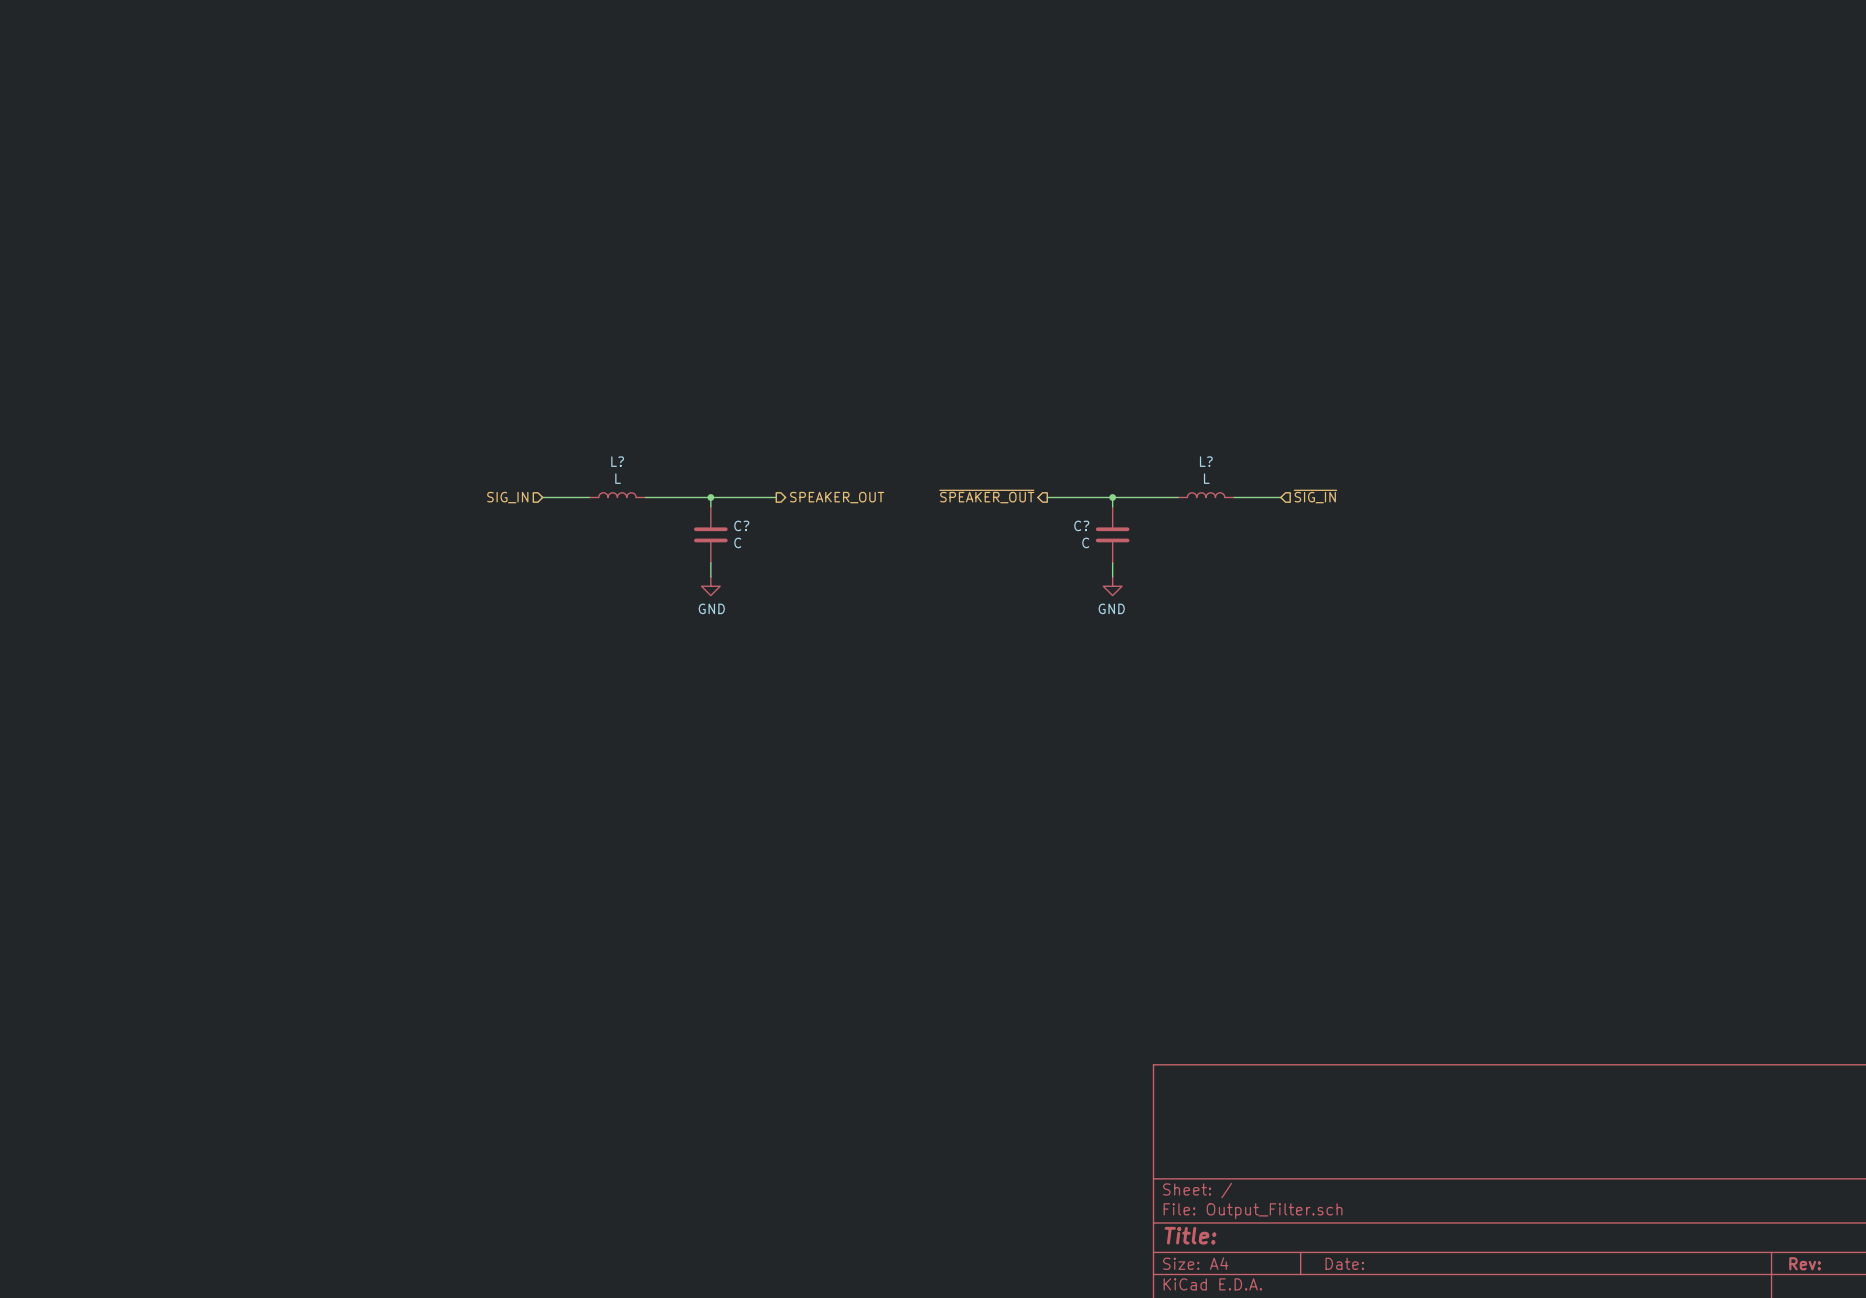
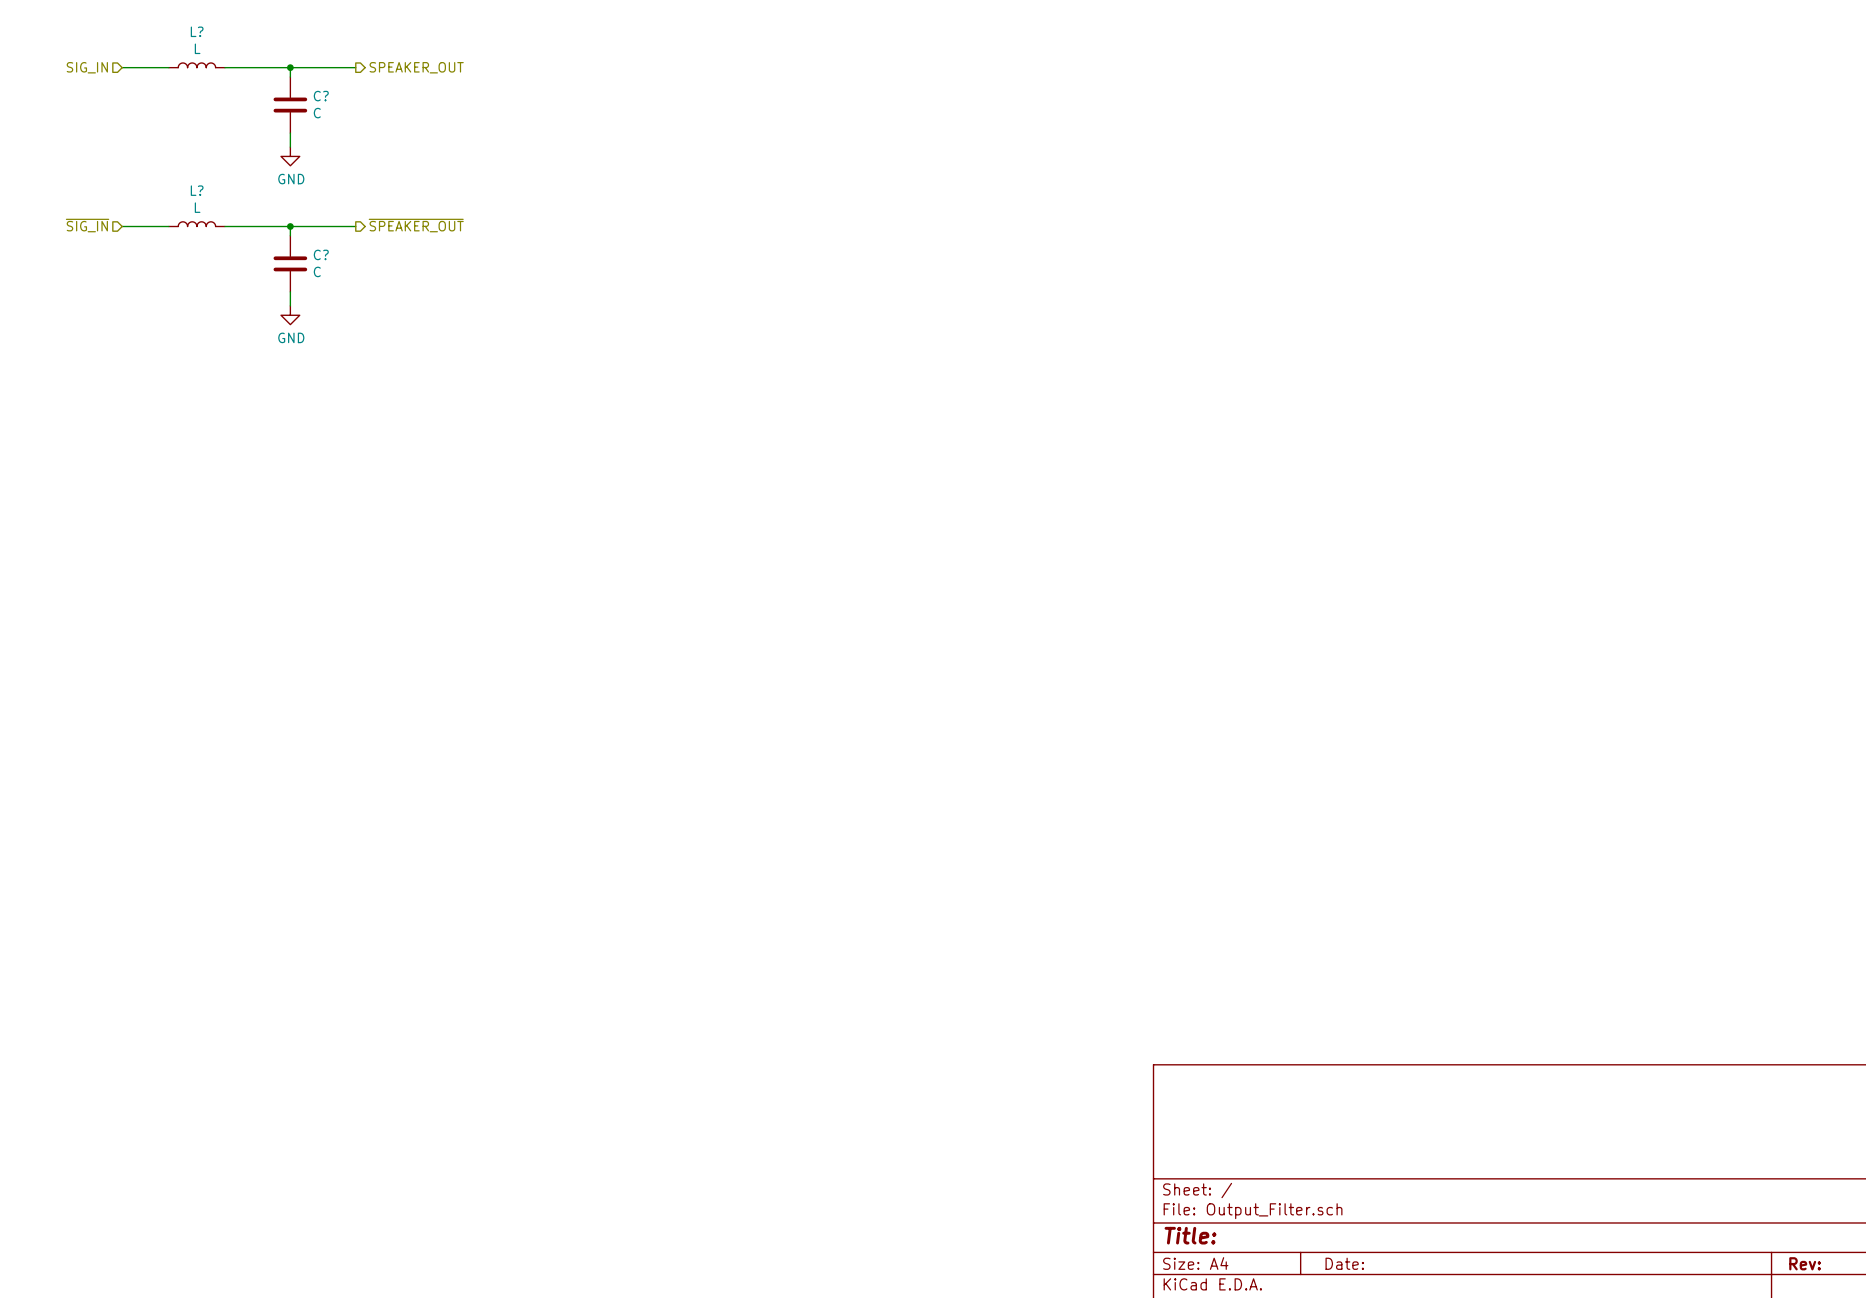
L?: none -> L (196, 65)
hierarchical label: none -> SIG_IN (87, 67)
wire: none -> (122, 67) (168, 67)
wire: none -> (224, 67) (355, 67)
wire: none -> (290, 67) (290, 77)
junction: none -> (290, 67)
hierarchical label: none -> SPEAKER_OUT (416, 67)
C?: none -> C (290, 105)
wire: none -> (290, 133) (290, 147)
power symbol: none -> GND (290, 156)
L?: none -> L (196, 224)
hierarchical label: none -> ~{SIG_IN} (87, 225)
hierarchical label: none -> ~{SPEAKER_OUT} (416, 225)
wire: none -> (122, 226) (168, 226)
wire: none -> (224, 226) (355, 226)
wire: none -> (290, 226) (290, 235)
junction: none -> (290, 226)
C?: none -> C (290, 263)
wire: none -> (290, 291) (290, 305)
power symbol: none -> GND (290, 315)
L?: L (617, 495) -> none
L?: L (1206, 495) -> none
hierarchical label: ~{SPEAKER_OUT} (986, 496) -> none
hierarchical label: ~{SIG_IN} (1315, 496) -> none
hierarchical label: SIG_IN (507, 497) -> none
wire: (542, 497) (589, 497) -> none
wire: (645, 497) (776, 497) -> none
wire: (710, 497) (710, 506) -> none
junction: (710, 497) -> none
hierarchical label: SPEAKER_OUT (837, 497) -> none
wire: (1047, 497) (1178, 497) -> none
wire: (1112, 497) (1112, 506) -> none
junction: (1112, 497) -> none
wire: (1234, 497) (1280, 497) -> none
C?: C (710, 534) -> none
C?: C (1112, 534) -> none
wire: (710, 562) (710, 576) -> none
wire: (1112, 562) (1112, 576) -> none
power symbol: GND (710, 586) -> none
power symbol: GND (1112, 586) -> none

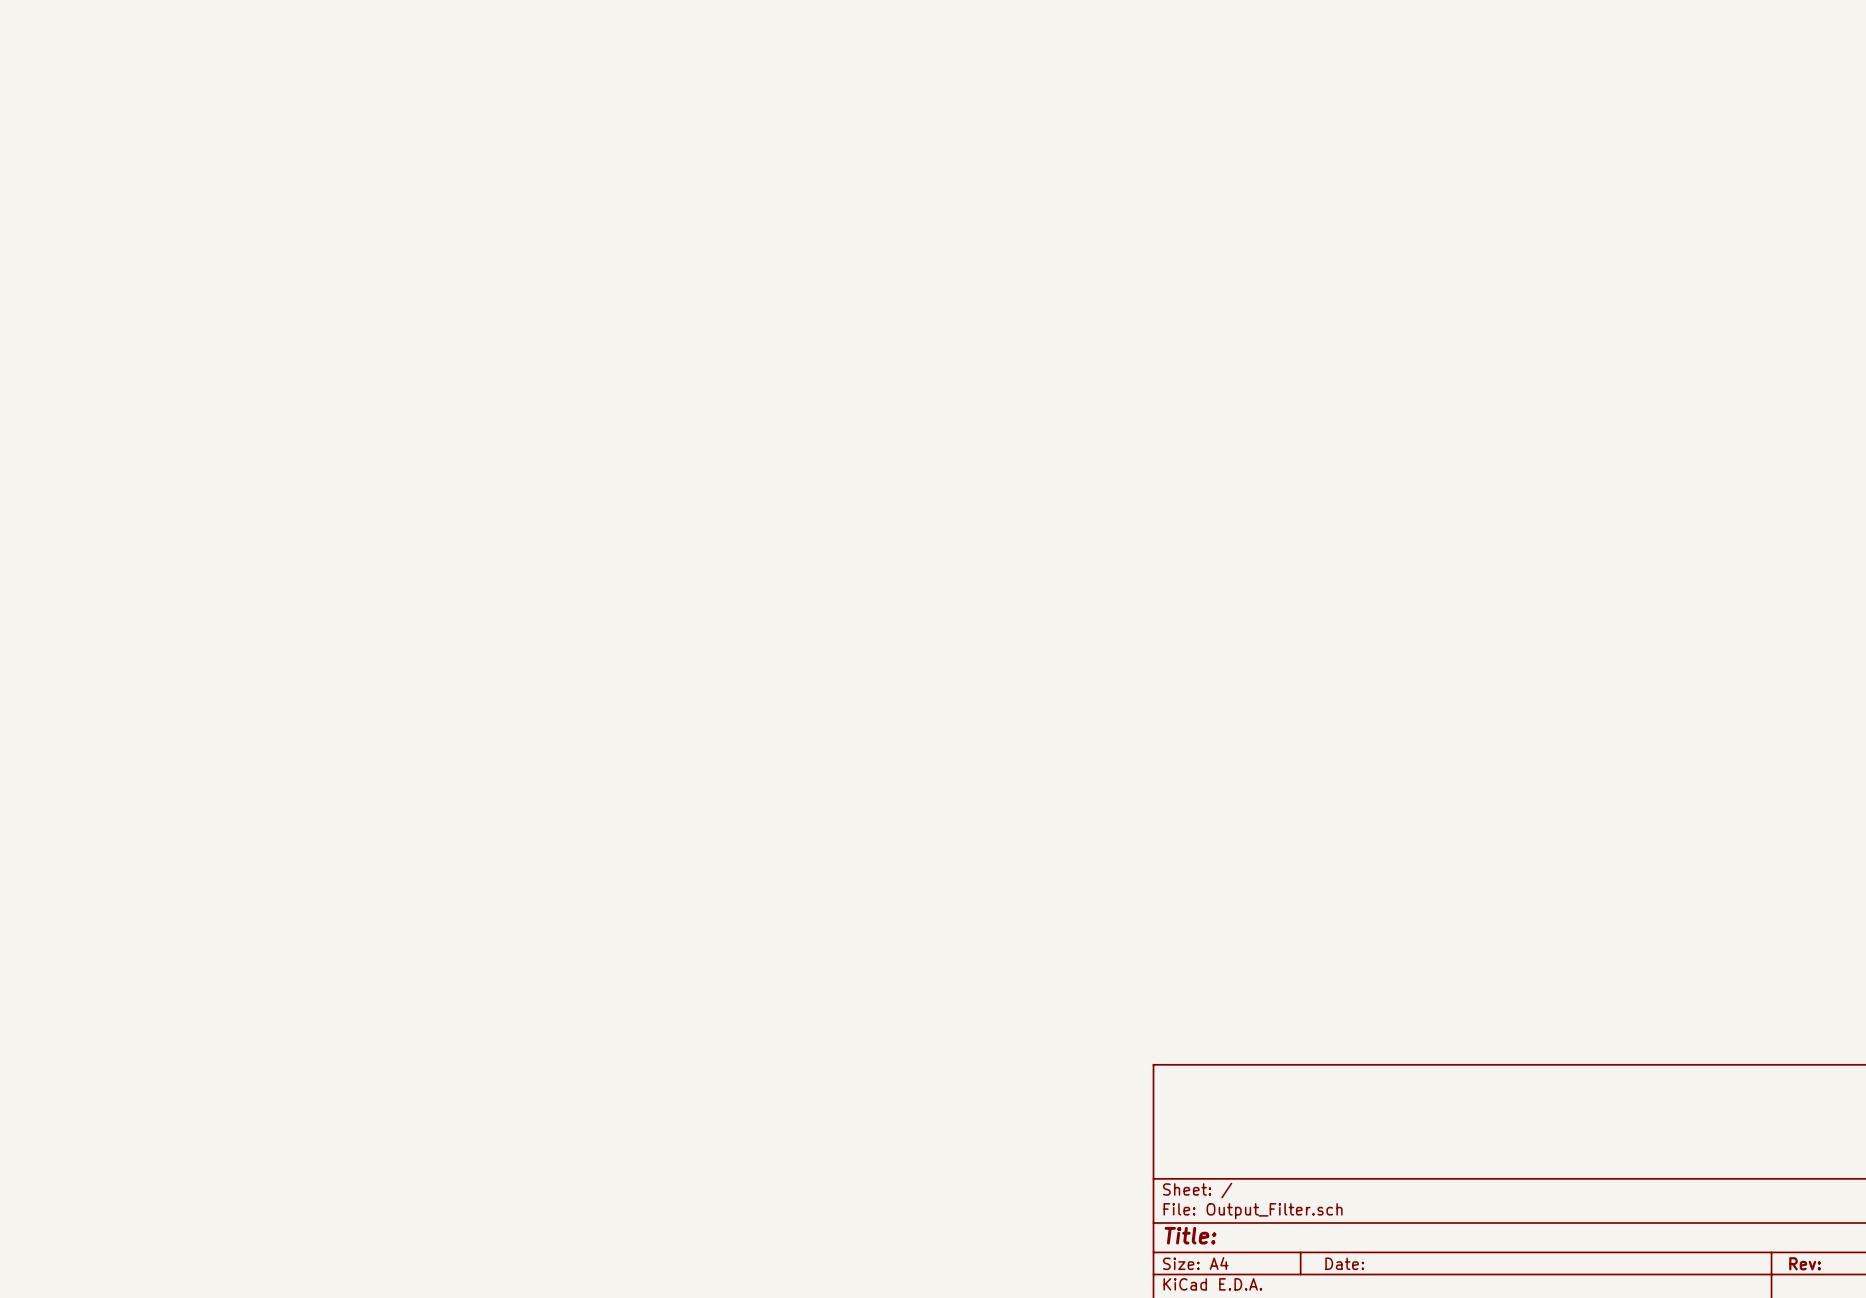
L?: L (196, 65) -> none
hierarchical label: SIG_IN (87, 67) -> none
wire: (122, 67) (168, 67) -> none
wire: (224, 67) (355, 67) -> none
wire: (290, 67) (290, 77) -> none
junction: (290, 67) -> none
hierarchical label: SPEAKER_OUT (416, 67) -> none
C?: C (290, 105) -> none
wire: (290, 133) (290, 147) -> none
power symbol: GND (290, 156) -> none
L?: L (196, 224) -> none
hierarchical label: ~{SIG_IN} (87, 225) -> none
hierarchical label: ~{SPEAKER_OUT} (416, 225) -> none
wire: (122, 226) (168, 226) -> none
wire: (224, 226) (355, 226) -> none
wire: (290, 226) (290, 235) -> none
junction: (290, 226) -> none
C?: C (290, 263) -> none
wire: (290, 291) (290, 305) -> none
power symbol: GND (290, 315) -> none

